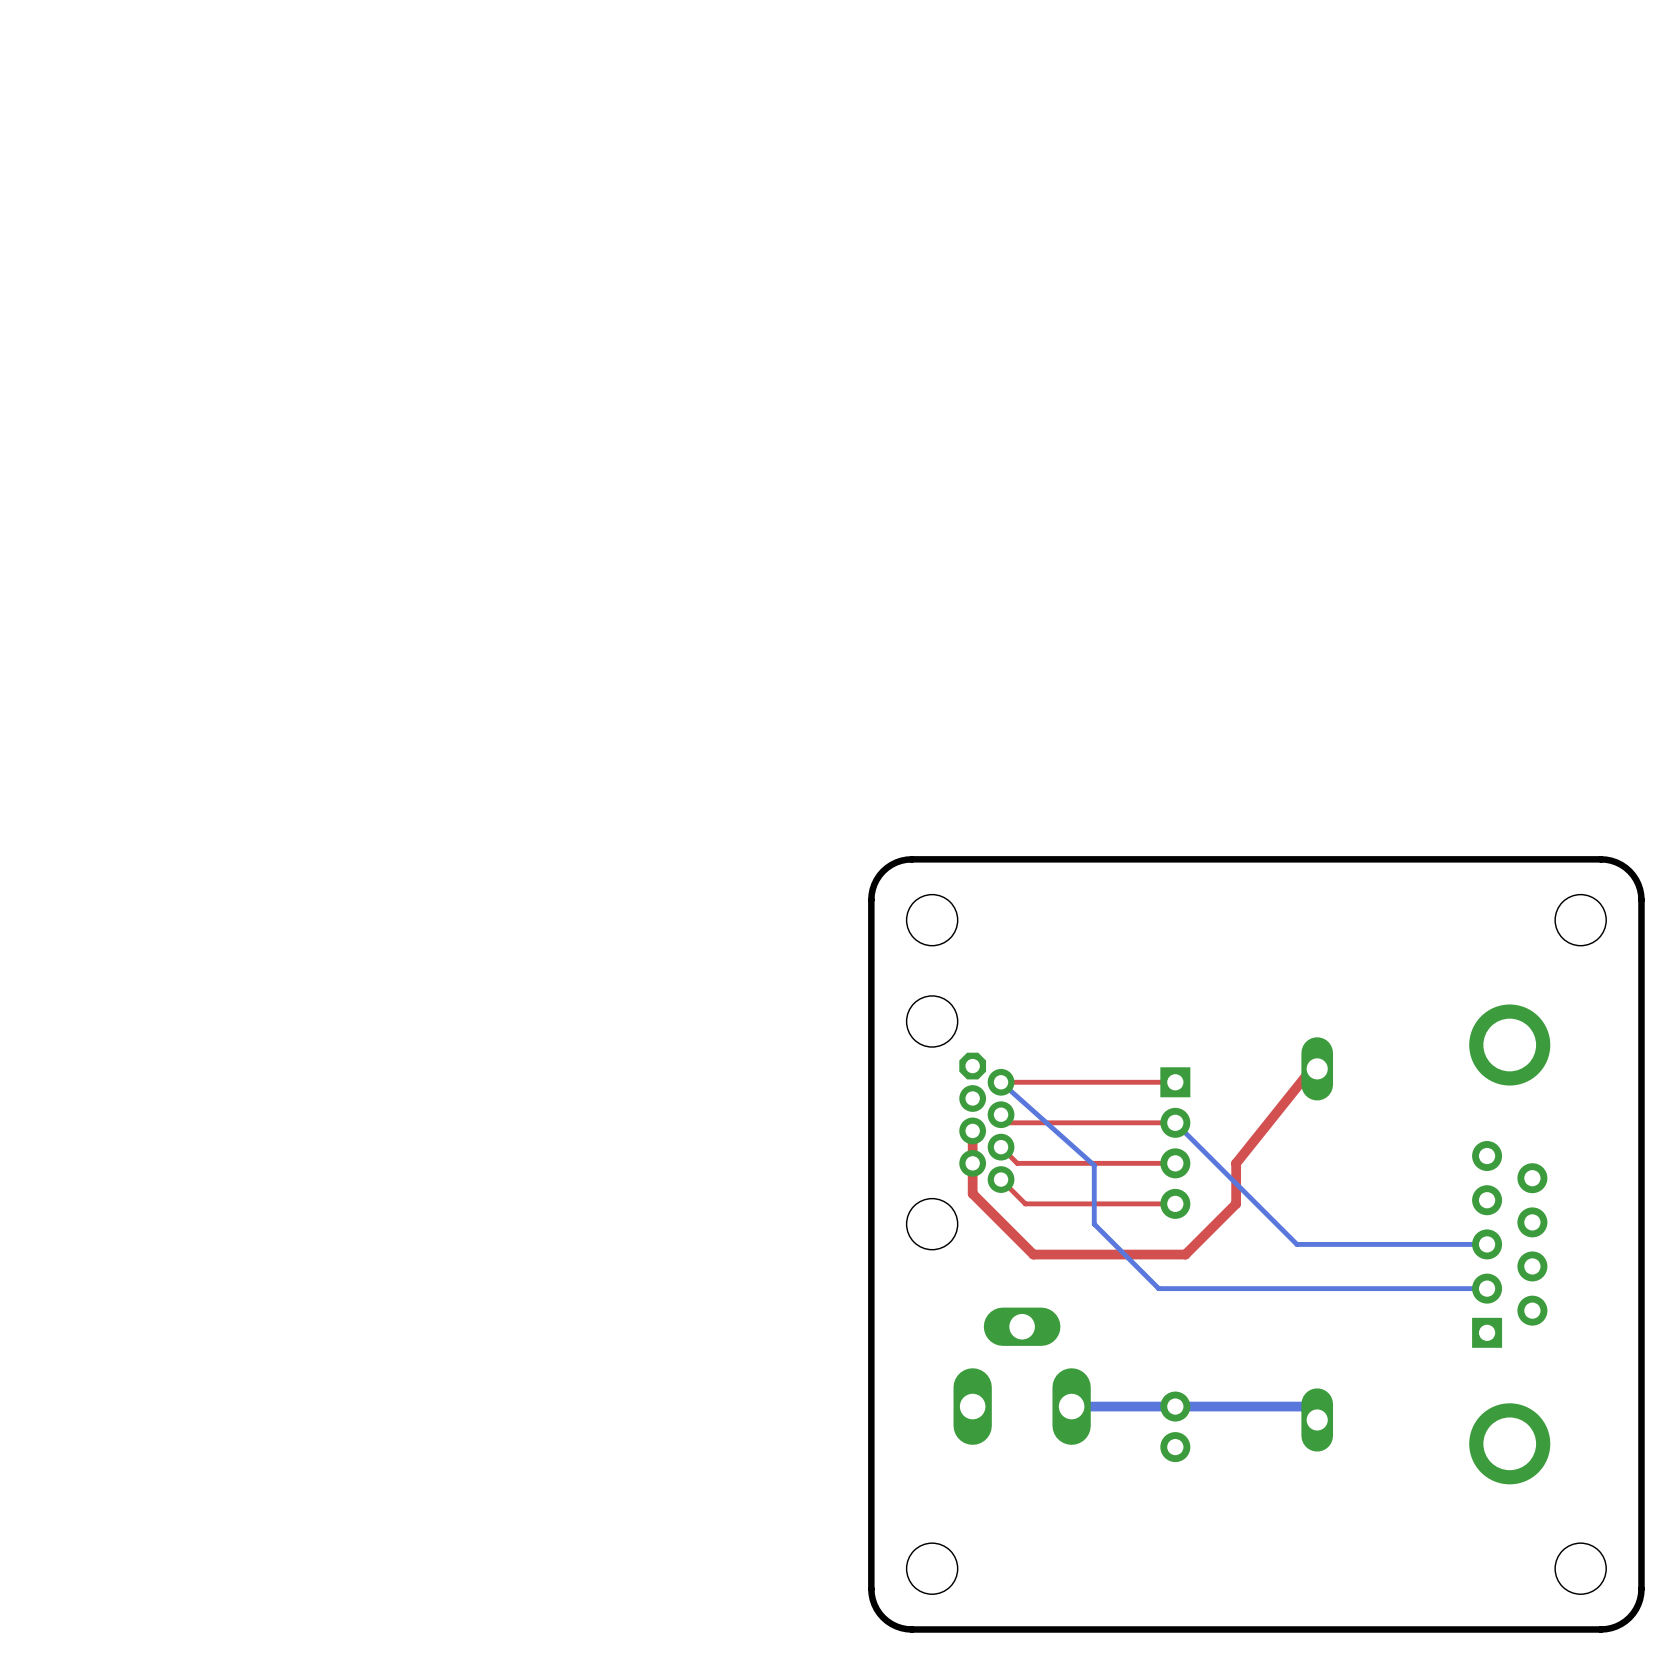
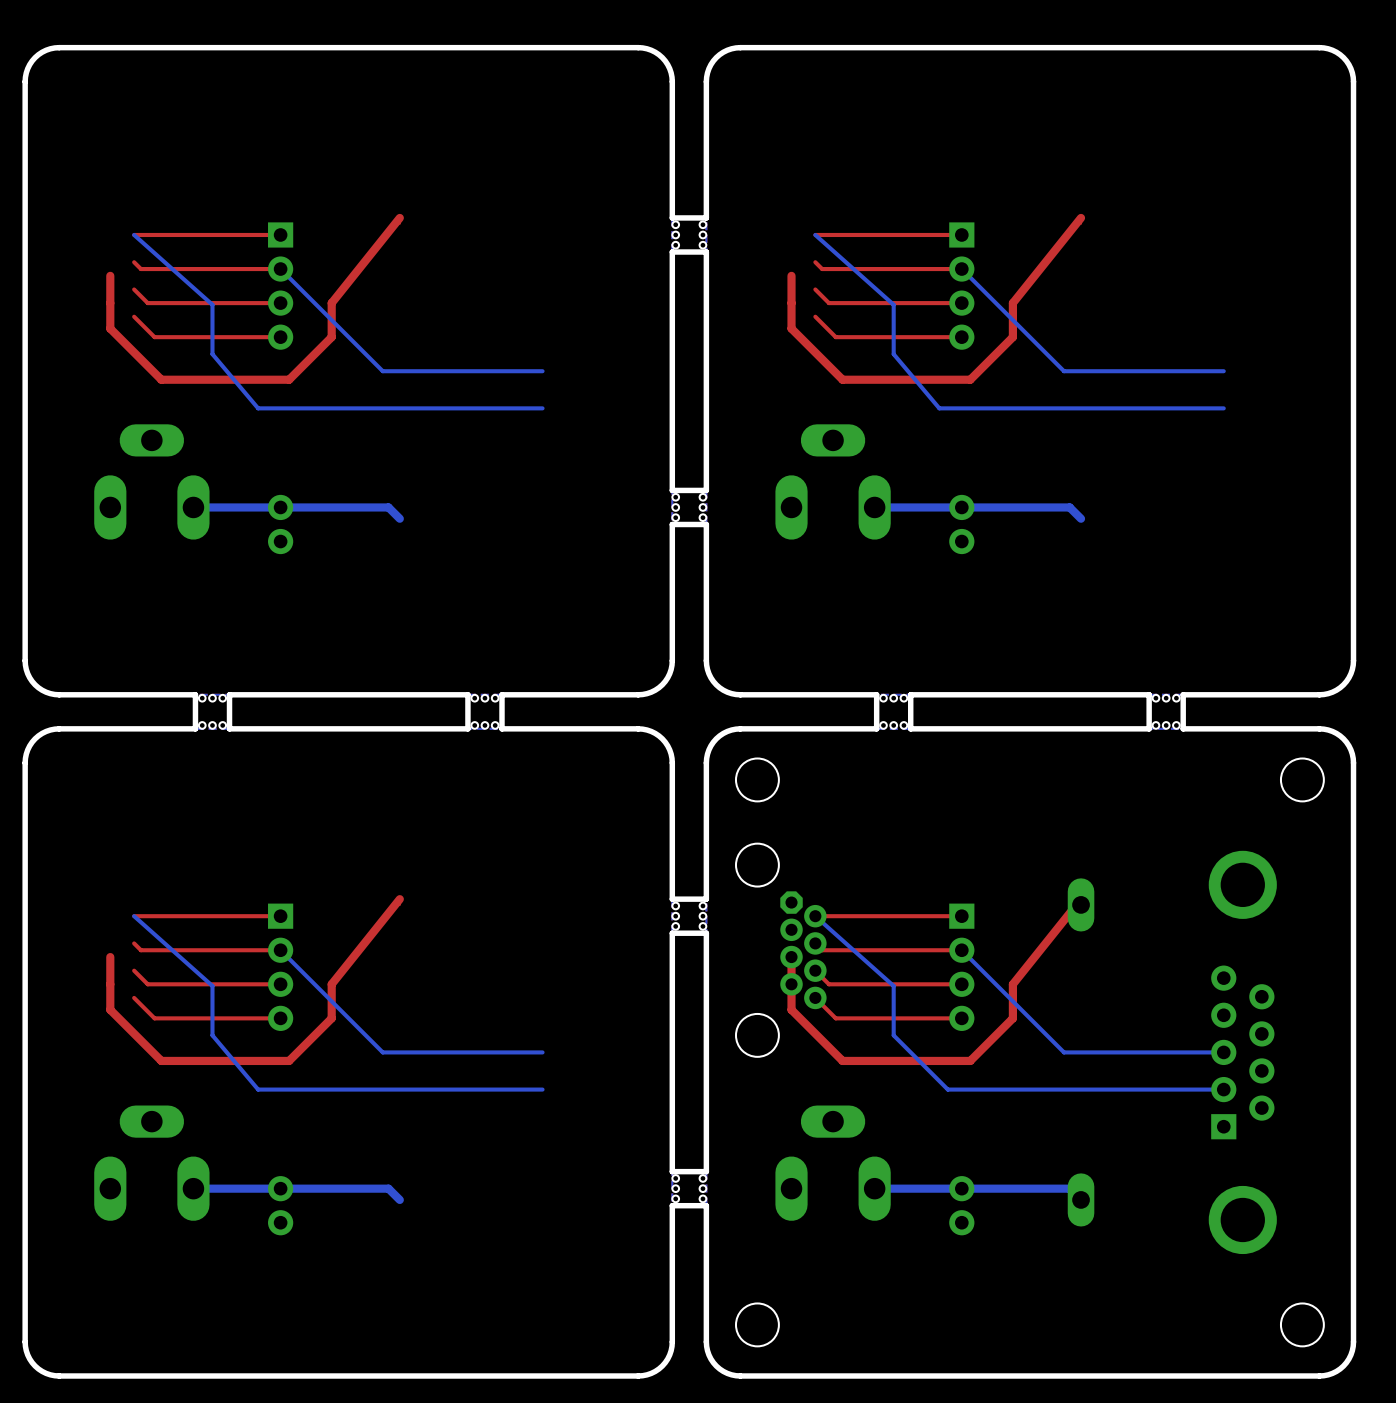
top track: none -> (399, 223) (399, 217) (331, 303) (331, 337) (289, 379) (161, 379) (110, 328) (110, 275)
top track: none -> (1081, 223) (1081, 217) (1012, 303) (1012, 337) (970, 379) (842, 379) (791, 328) (791, 275)
bottom track: none -> (134, 234) (212, 304) (212, 354) (258, 408) (542, 408)
top track: none -> (280, 234) (134, 234)
part: none -> (689, 234)
bottom track: none -> (815, 234) (893, 304) (893, 354) (939, 408) (1223, 408)
top track: none -> (961, 234) (815, 234)
board edge: none -> (706, 252) (706, 490) (672, 490) (672, 252) (706, 252)
top track: none -> (134, 262) (140, 269) (280, 269)
top track: none -> (815, 262) (822, 269) (961, 269)
bottom track: none -> (280, 269) (382, 371) (542, 371)
bottom track: none -> (961, 269) (1063, 371) (1223, 371)
part: none -> (280, 286)
part: none -> (961, 286)
top track: none -> (134, 289) (147, 303) (280, 303)
top track: none -> (815, 289) (828, 303) (961, 303)
top track: none -> (134, 316) (154, 337) (280, 337)
top track: none -> (815, 316) (835, 337) (961, 337)
part: none -> (151, 481)
part: none -> (833, 481)
bottom track: none -> (193, 507) (388, 507) (399, 518)
part: none -> (689, 507)
bottom track: none -> (874, 507) (1069, 507) (1081, 518)
part: none -> (280, 524)
part: none -> (961, 524)
board edge: none -> (467, 694) (229, 694) (229, 728) (467, 728) (467, 694)
part: none -> (212, 711)
part: none -> (484, 711)
part: none -> (893, 711)
part: none -> (1166, 711)
board edge: (1114, 859) (1074, 859) -> (706, 899) (672, 899) (672, 762) (669, 749) (662, 738) (651, 731) (638, 728) (502, 728) (502, 694) (638, 694) (647, 693) (658, 687) (667, 677) (672, 665) (672, 524) (706, 524) (706, 660) (707, 669) (713, 681) (723, 690) (735, 694) (876, 694) (876, 728)
board edge: (1438, 859) (1398, 859) -> (910, 728) (910, 694) (1149, 694) (1149, 728)
board edge: (871, 1062) (871, 1102) -> (706, 1171) (672, 1171) (672, 933) (706, 933)
top track: none -> (399, 904) (399, 899) (331, 984) (331, 1018) (289, 1060) (161, 1060) (110, 1009) (110, 957)
bottom track: none -> (134, 916) (212, 986) (212, 1035) (258, 1089) (542, 1089)
top track: none -> (280, 916) (134, 916)
part: none -> (689, 916)
top track: none -> (134, 943) (140, 950) (280, 950)
bottom track: none -> (280, 950) (382, 1052) (542, 1052)
part: none -> (280, 967)
top track: none -> (134, 970) (147, 984) (280, 984)
top track: none -> (134, 997) (154, 1018) (280, 1018)
part: none -> (151, 1163)
board edge: (871, 1386) (871, 1426) -> (1183, 728) (1183, 694) (1323, 694) (1332, 692) (1343, 684) (1352, 669) (1353, 81) (1348, 64) (1336, 52) (1319, 47) (731, 48) (716, 57) (708, 68) (706, 77) (706, 217) (672, 217) (672, 77) (669, 68) (662, 57) (647, 48) (59, 47) (46, 50) (35, 57) (27, 68) (25, 81) (26, 669) (35, 684) (46, 692) (54, 694) (195, 694) (195, 728) (54, 729) (46, 731) (35, 738) (26, 754) (25, 1341) (29, 1358) (42, 1371) (59, 1376) (647, 1374) (662, 1366) (669, 1354) (672, 1346) (672, 1205) (706, 1205)
bottom track: none -> (193, 1188) (388, 1188) (399, 1199)
part: none -> (689, 1188)
part: none -> (280, 1205)

